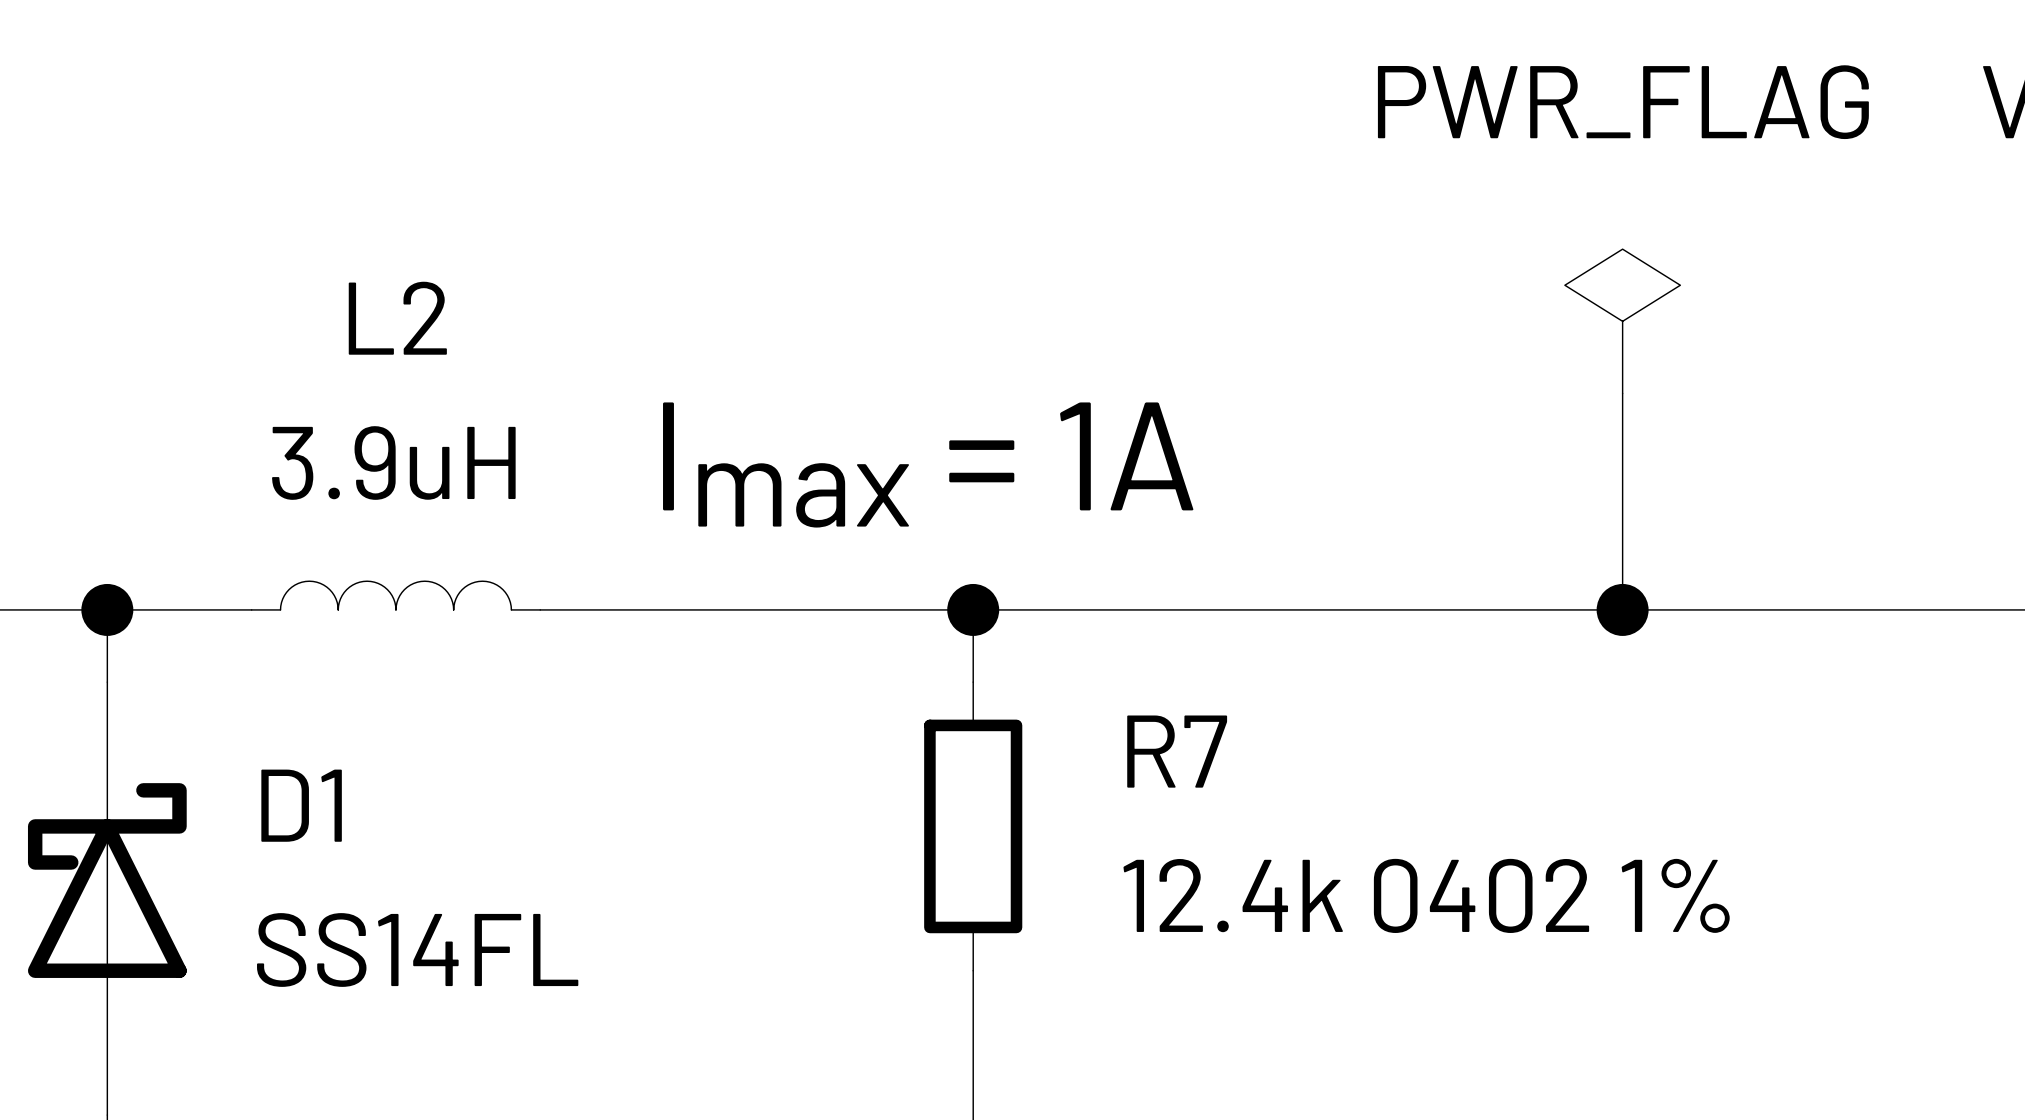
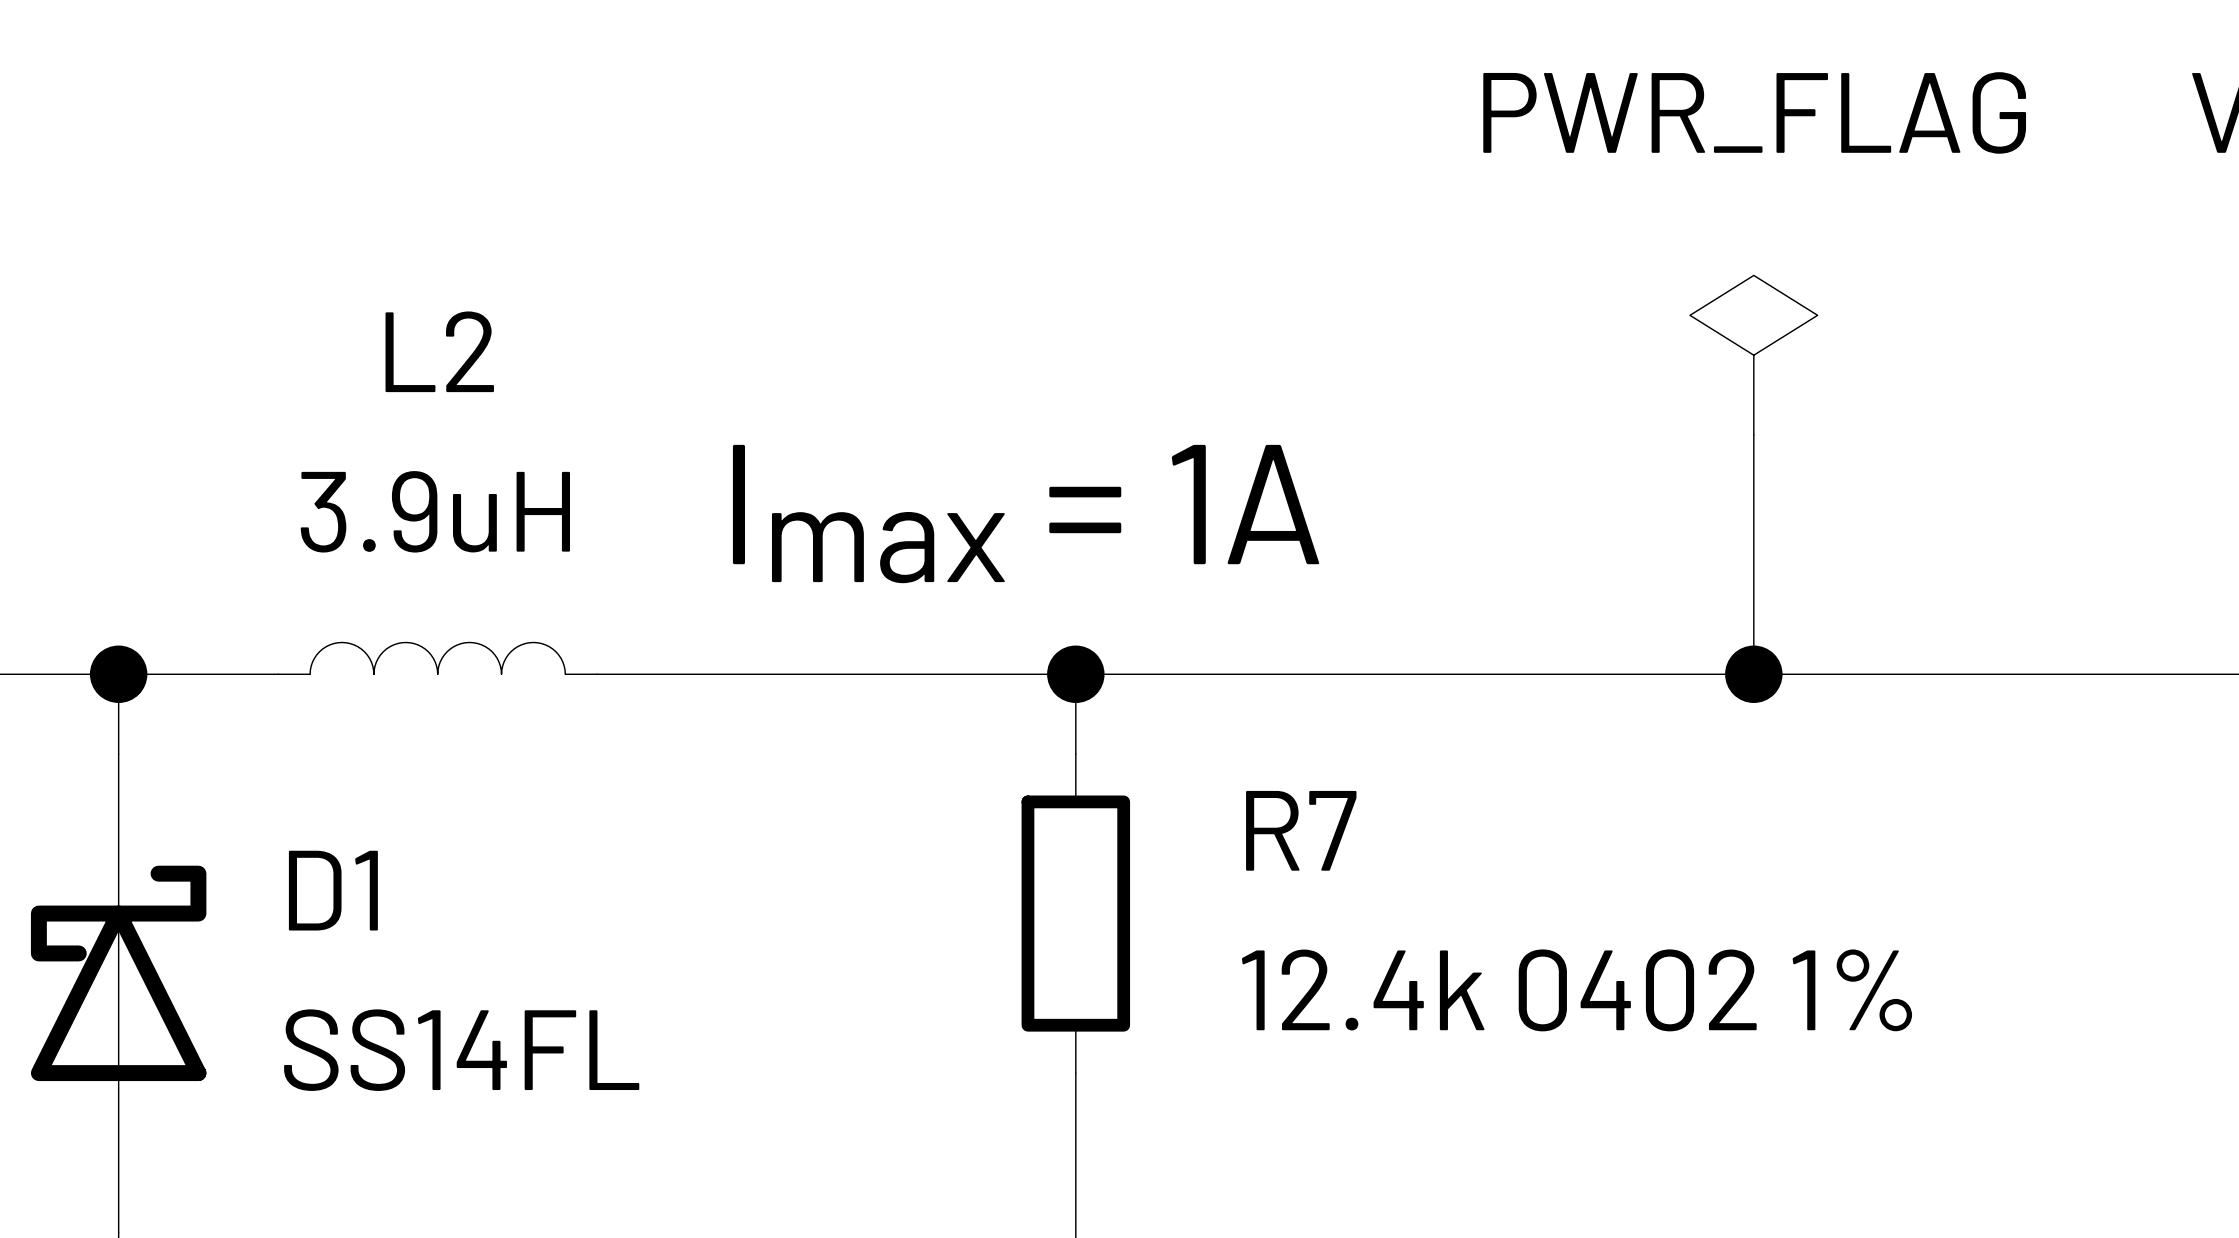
power symbol position: PWR_FLAG (1622, 321) -> PWR_FLAG (1753, 355)
wire: (1622, 393) (1622, 609) -> (1753, 434) (1753, 674)
junction position: (1622, 609) -> (1753, 674)

